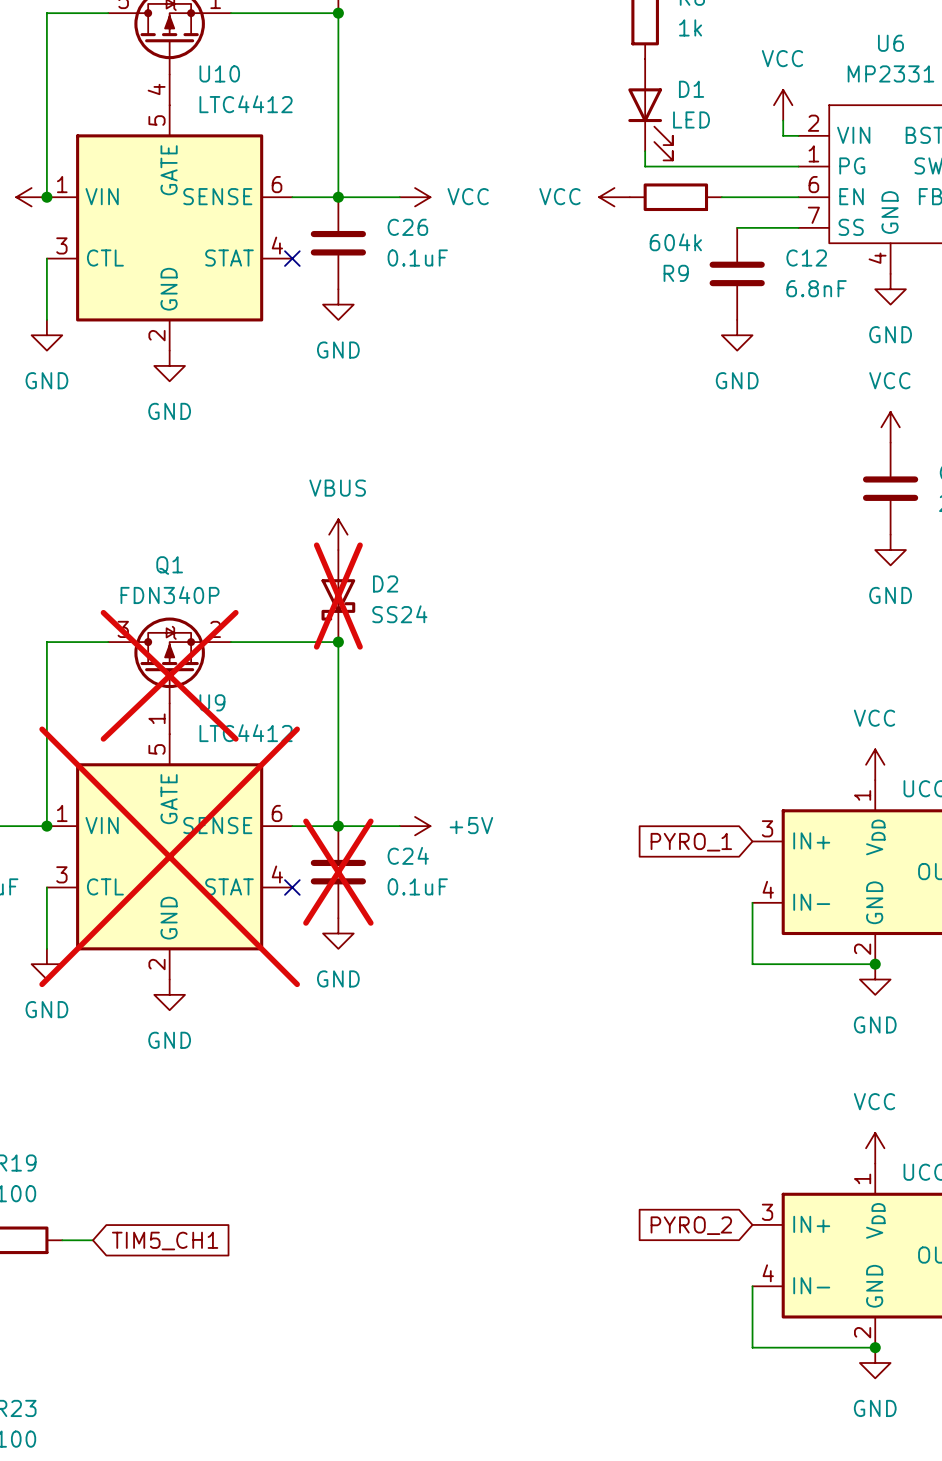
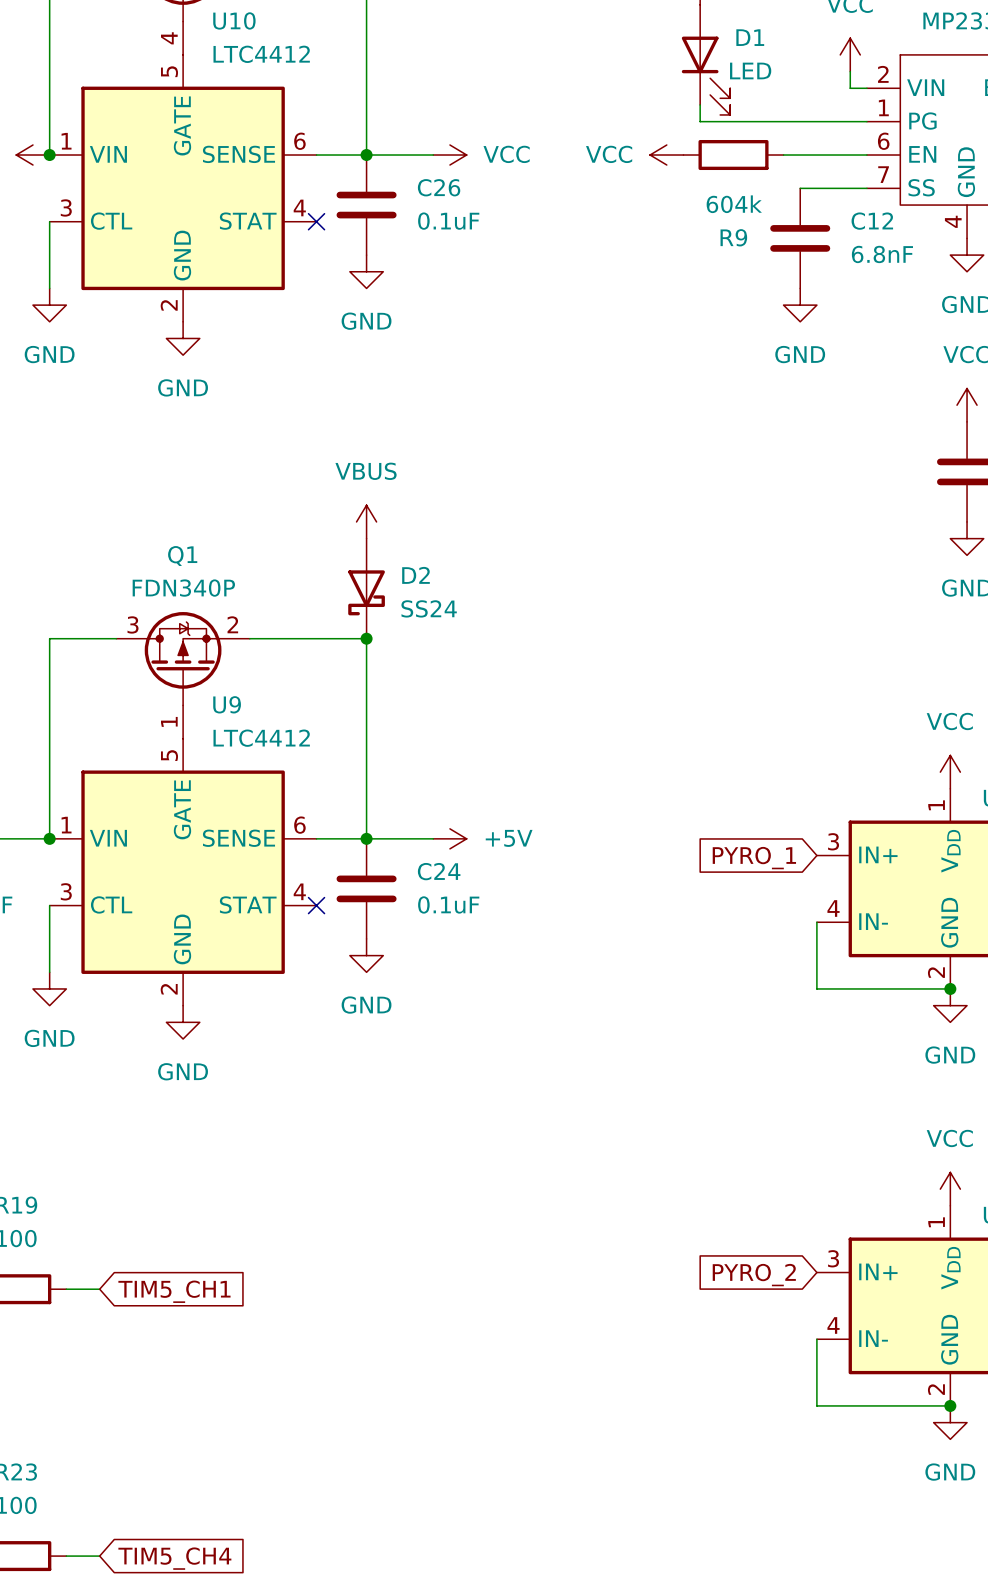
D2 do-not-place cross: (338, 596) -> none
Q1 do-not-place cross: (169, 675) -> none
U9 do-not-place cross: (169, 856) -> none
C24 do-not-place cross: (338, 872) -> none

